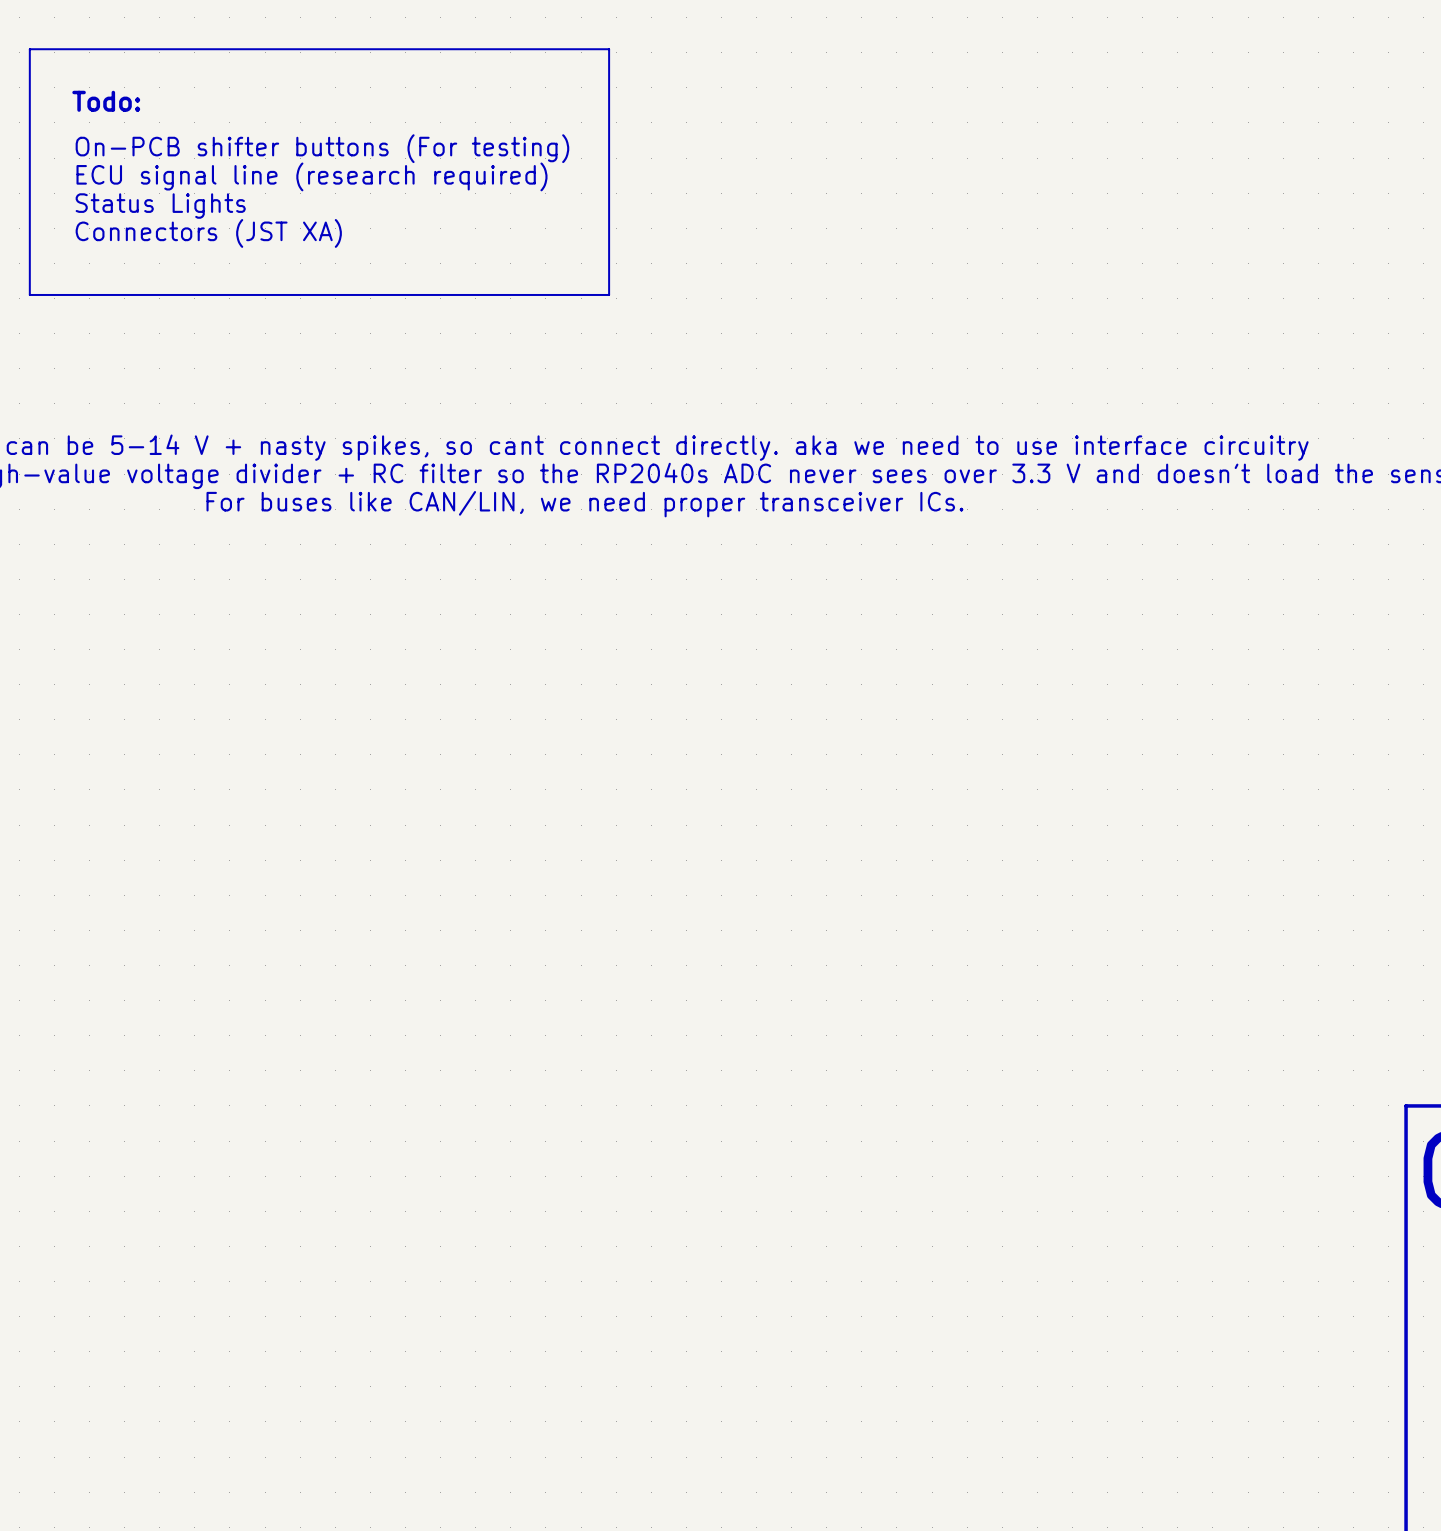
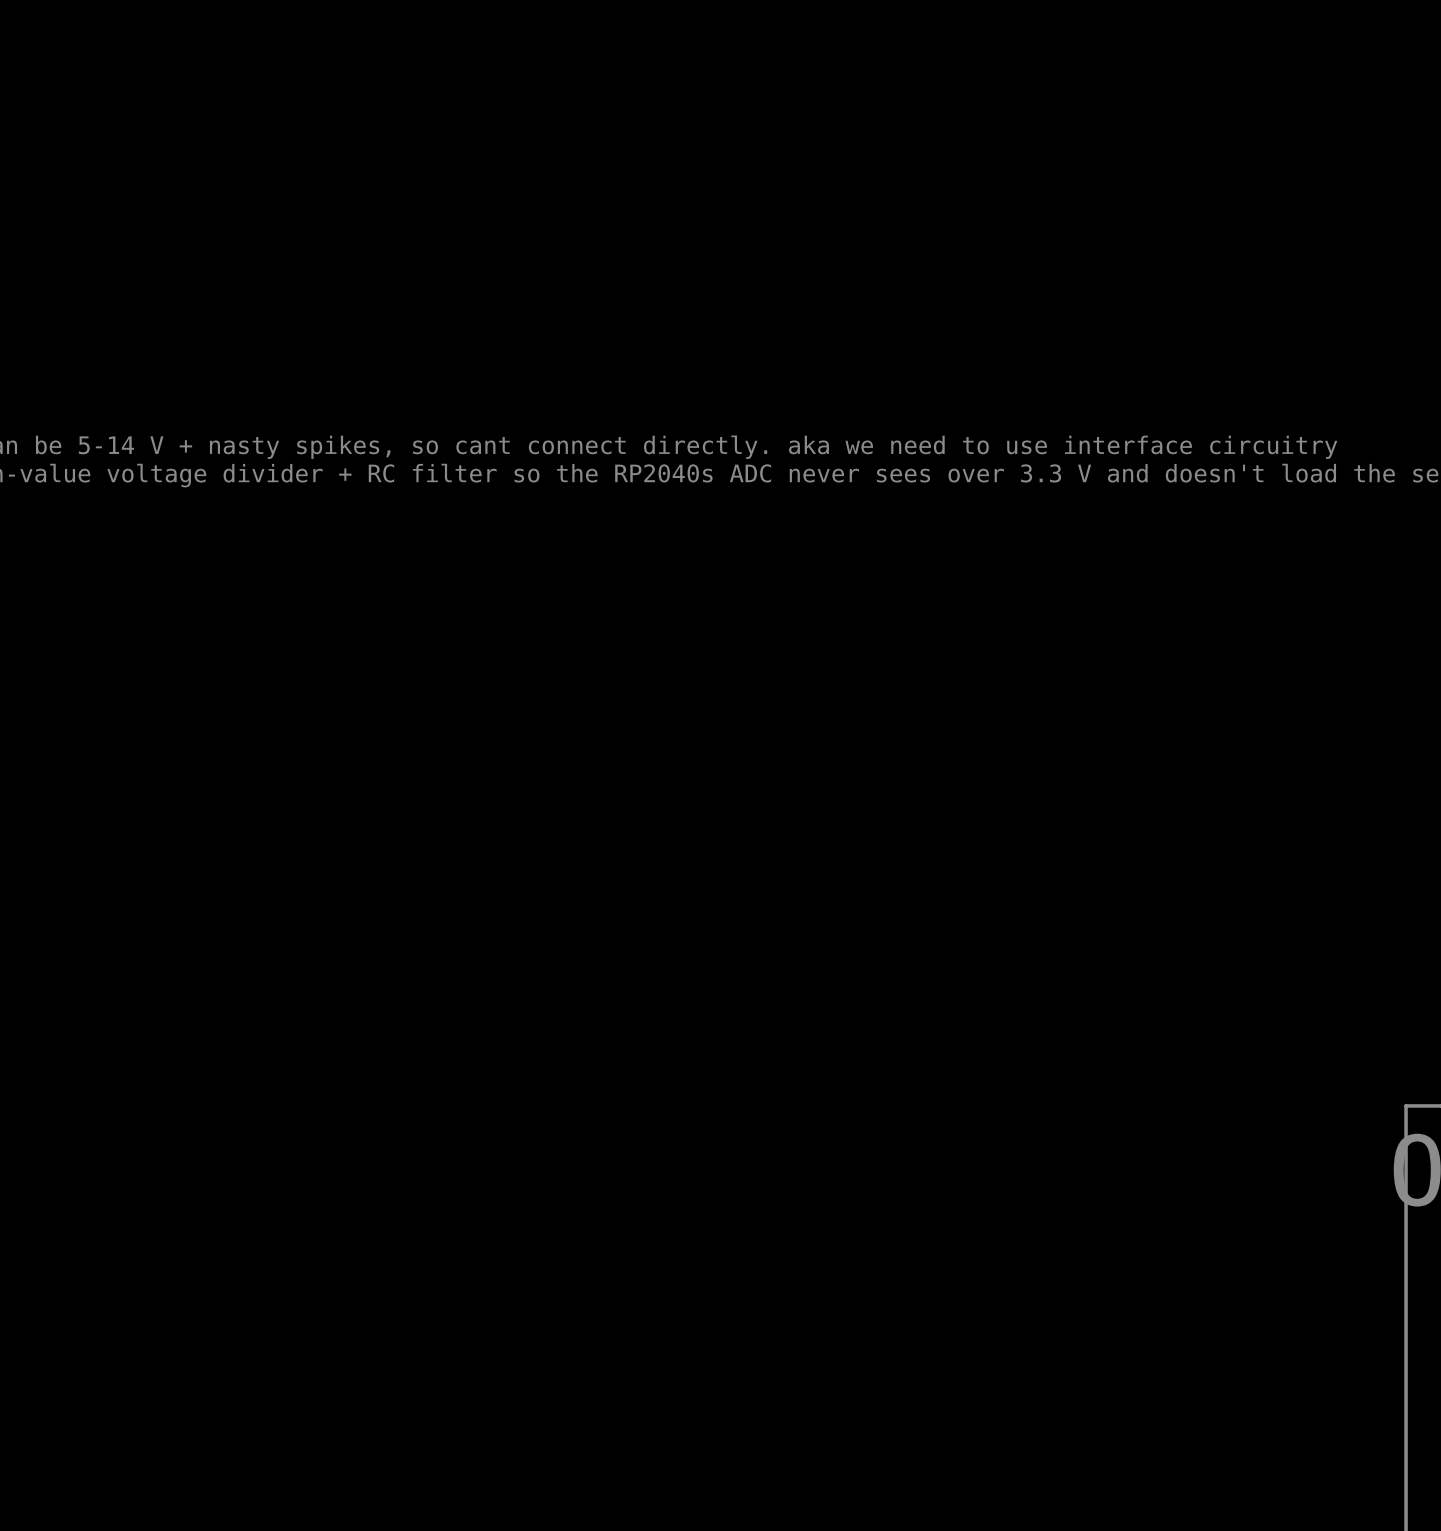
line: (29, 49) (609, 49) (609, 294) (29, 294) (29, 49) -> none
text: Todo: (106, 101) -> none
text: On-PCB shifter buttons (For testing) (322, 148) -> none
text: ECU signal line (research required) (311, 176) -> none
text: Status Lights (160, 206) -> none
text: Connectors (JST XA) (208, 233) -> none
text: For buses like CAN/LIN, we need proper transceiver ICs. (584, 504) -> none

